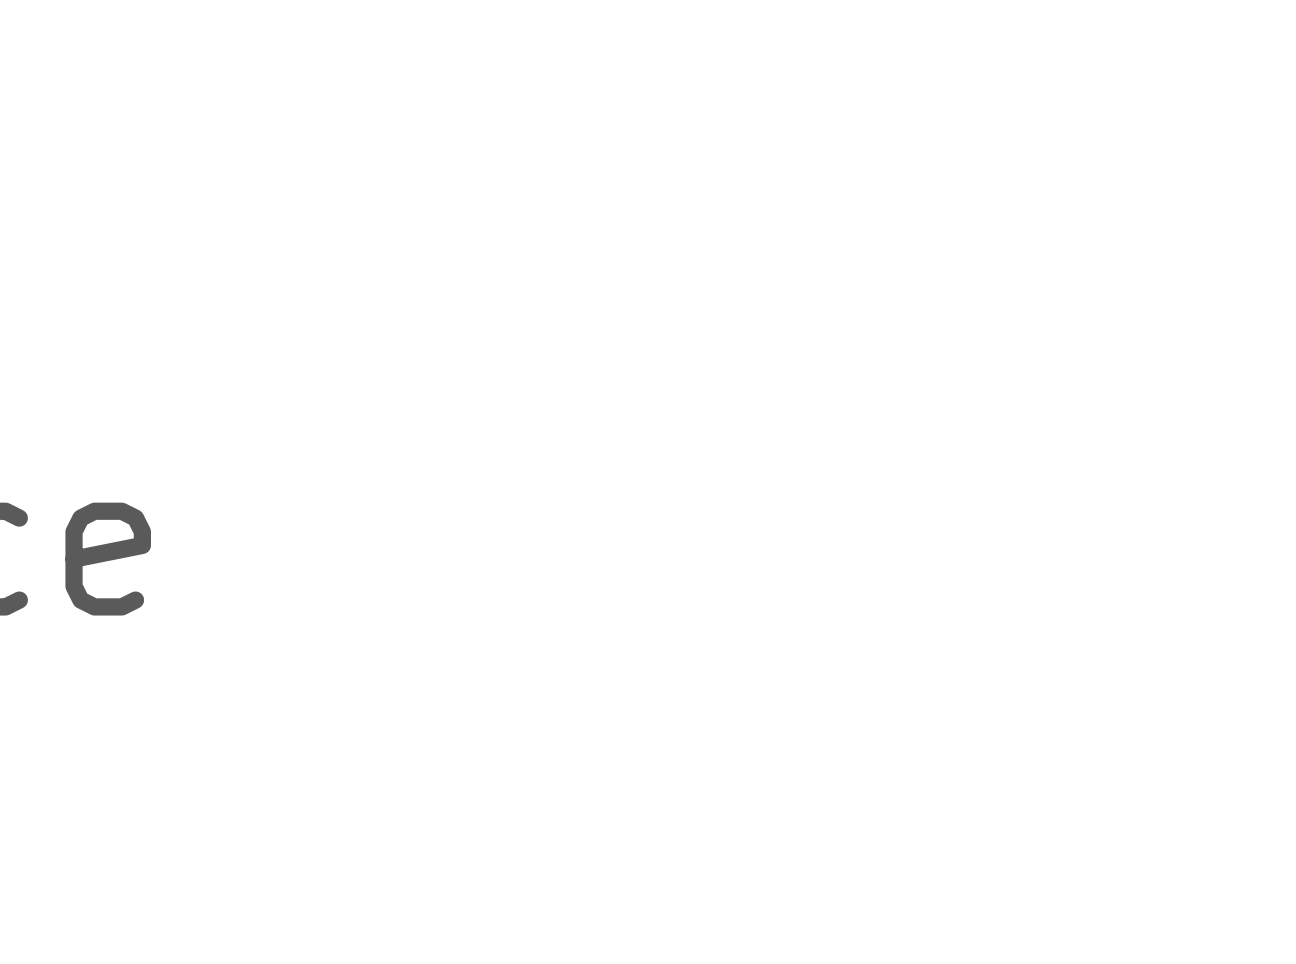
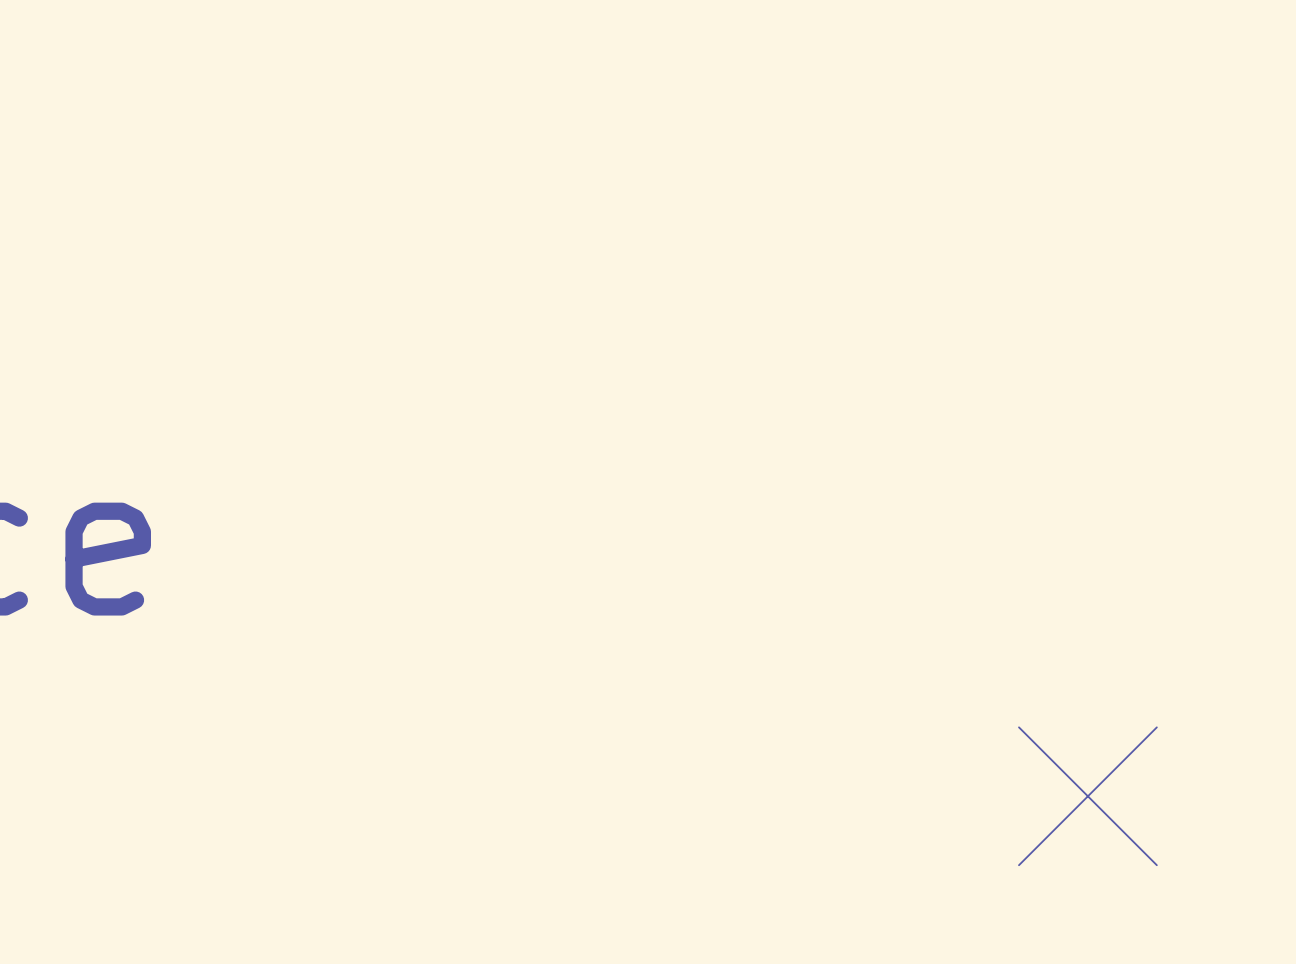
no-connect mark: none -> (1087, 796)

